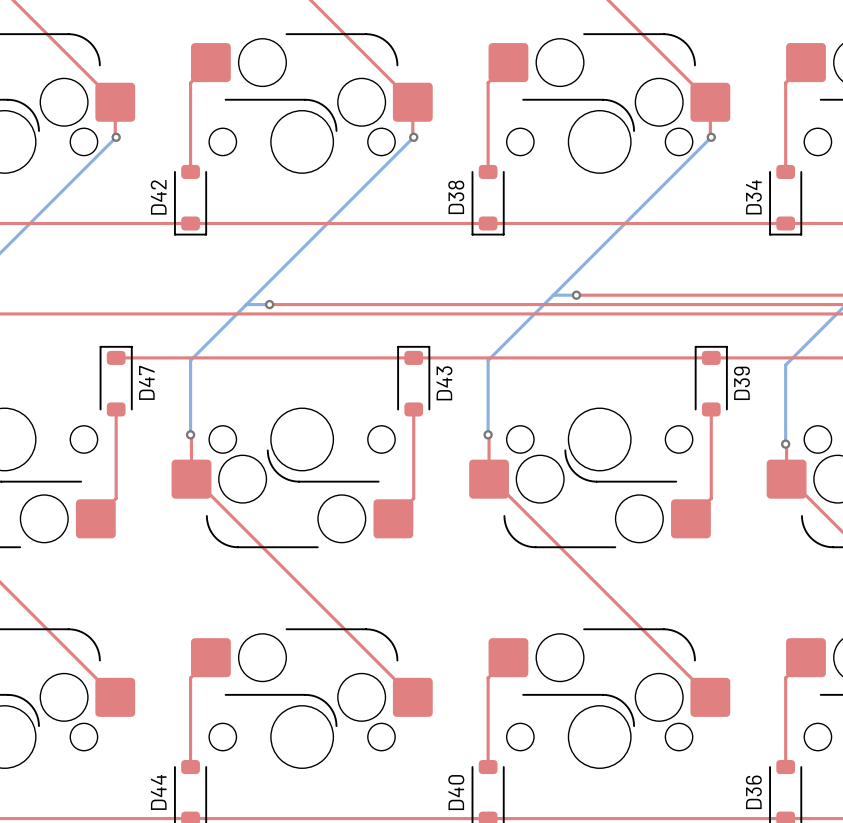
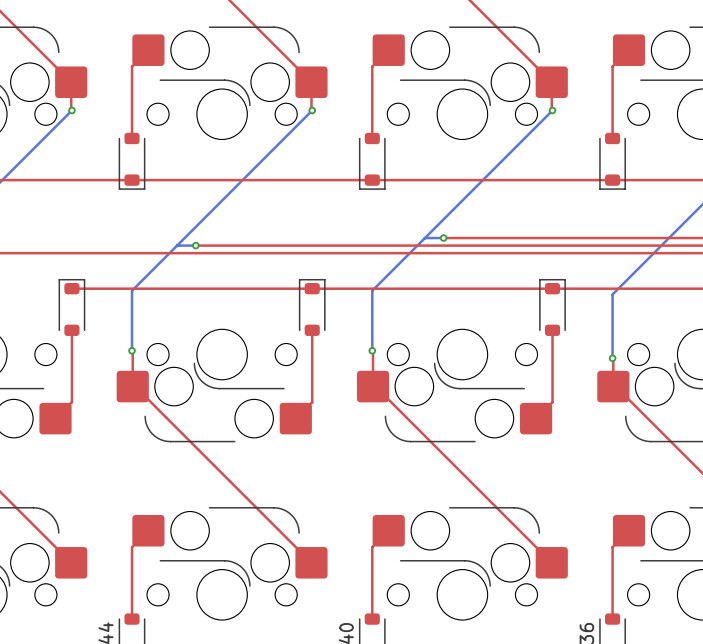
D42 name: D42 (158, 197) -> none
D38 name: D38 (456, 197) -> none
D34 name: D34 (753, 197) -> none
D47 name: D47 (146, 382) -> none
D43 name: D43 (444, 383) -> none
D39 name: D39 (741, 383) -> none

